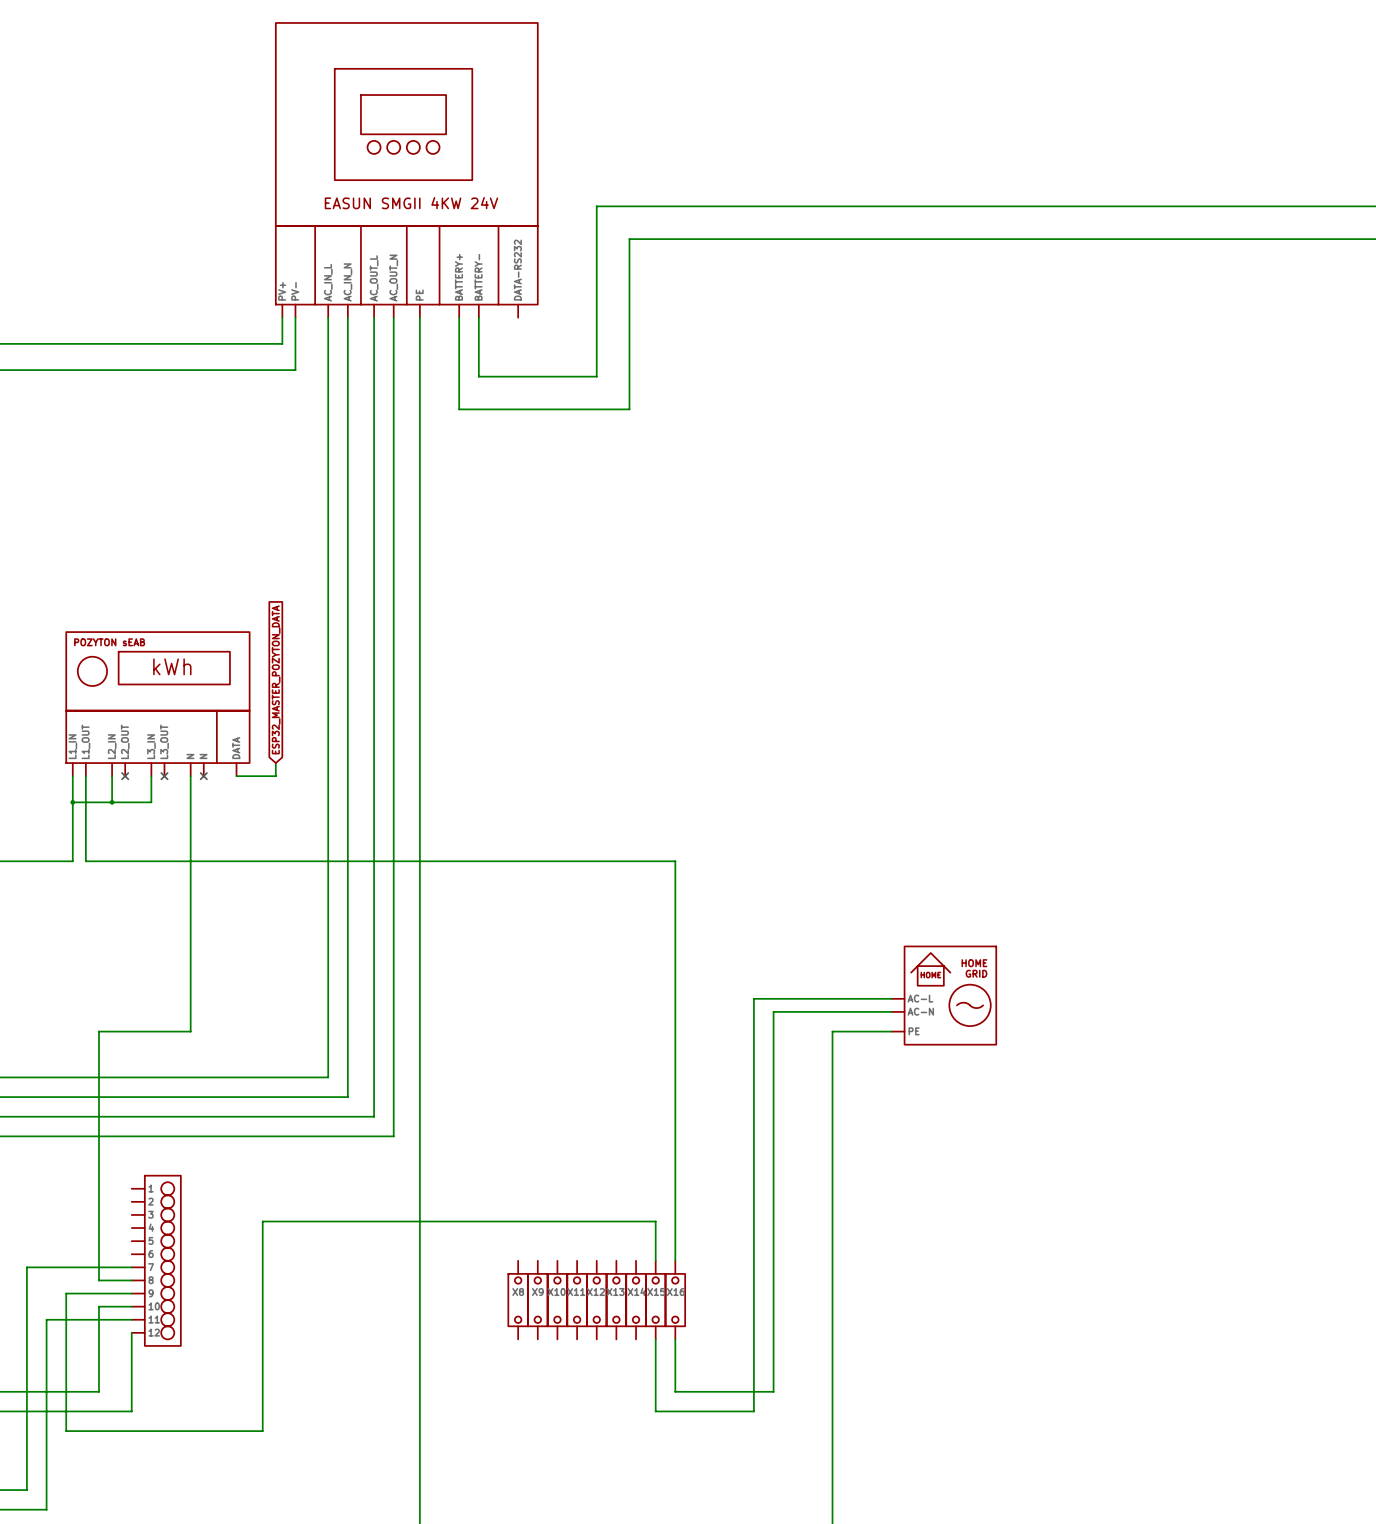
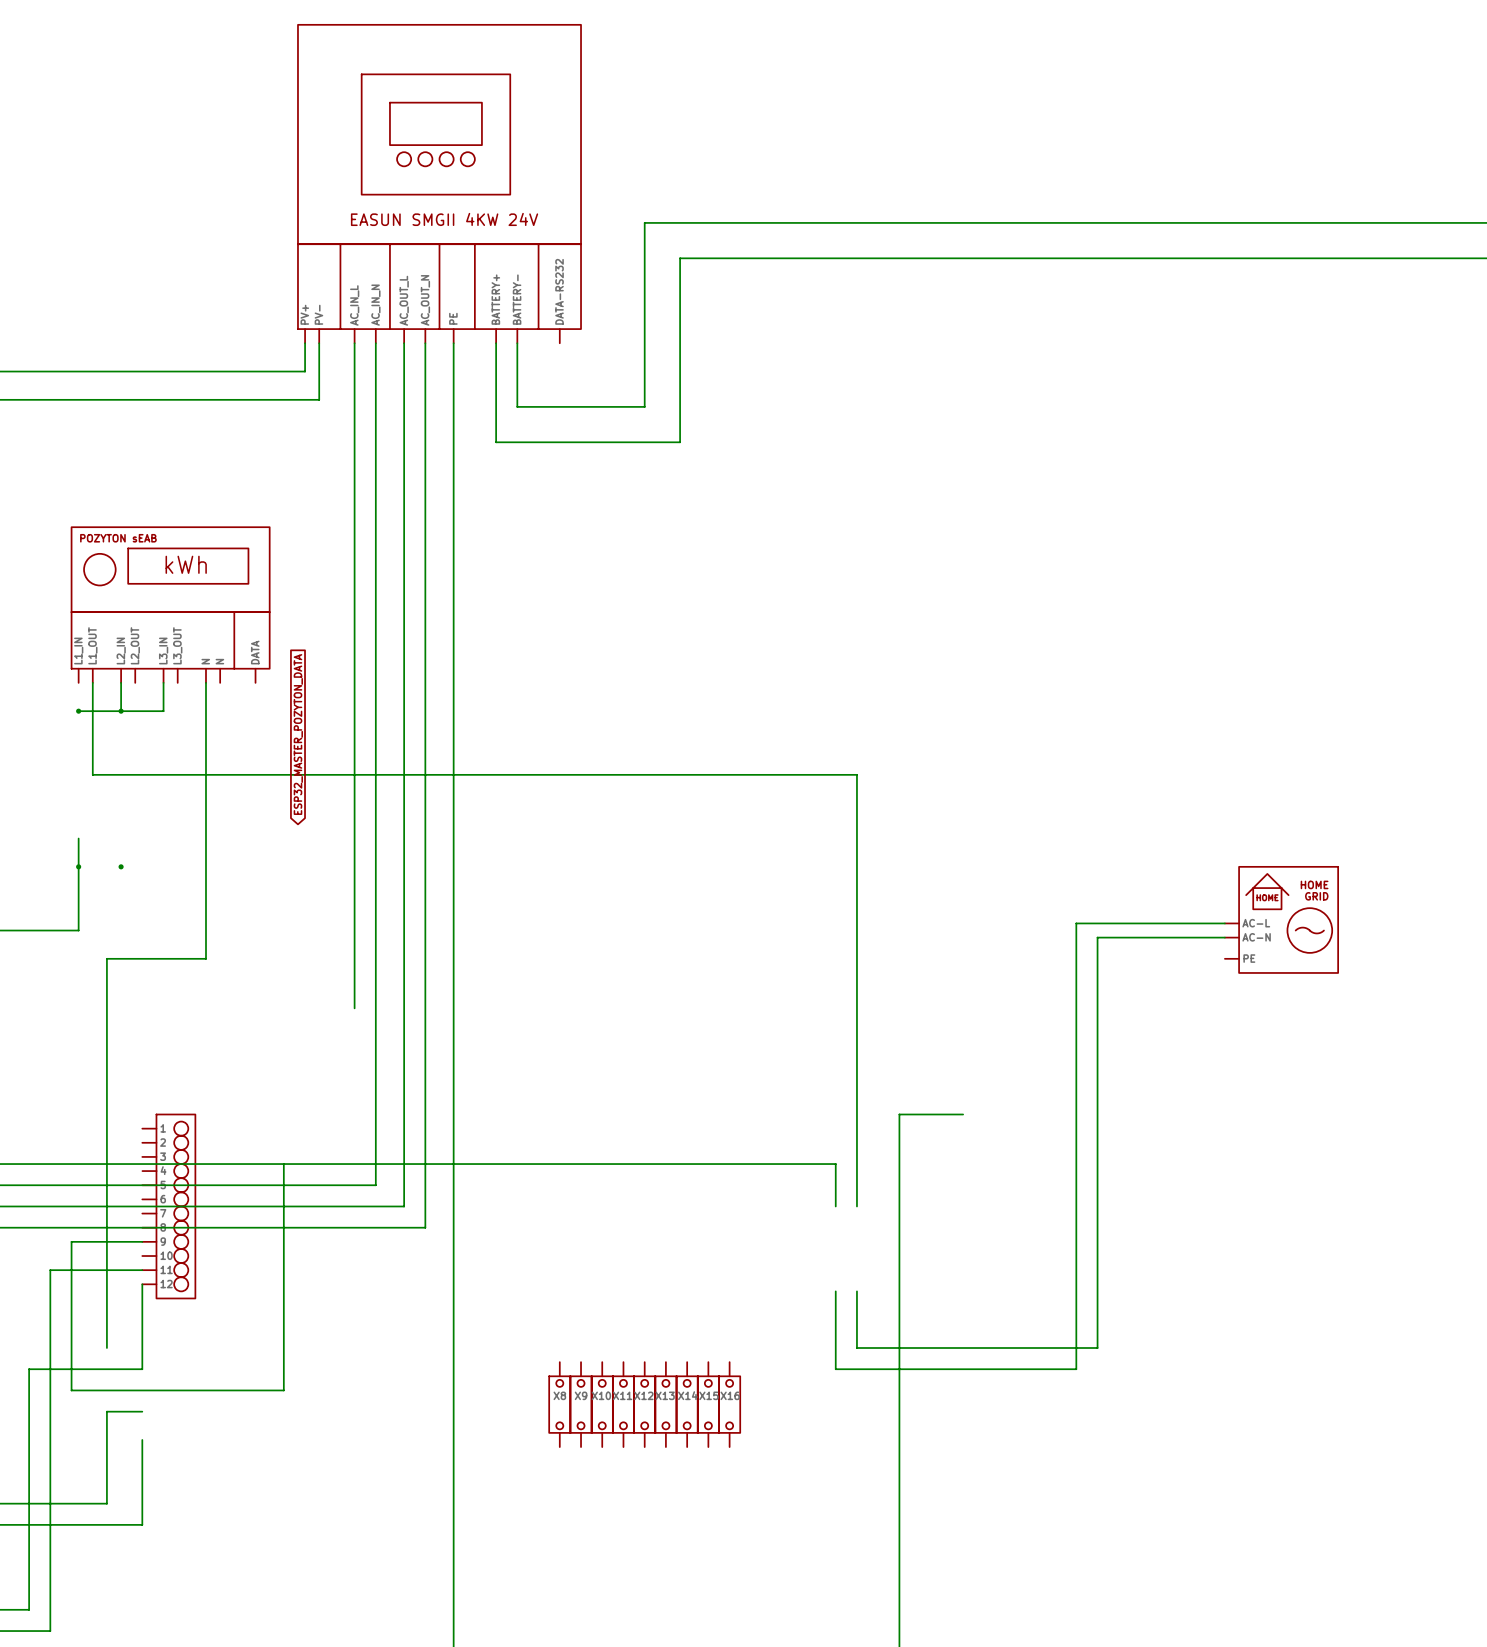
part: none -> (170, 605)
wire: none -> (92, 682) (92, 774) (856, 774) (856, 1206)
wire: none -> (121, 682) (121, 711)
wire: none -> (163, 682) (163, 711) (78, 711)
wire: none -> (206, 682) (206, 838)
junction: none -> (78, 711)
junction: none -> (121, 711)
part: (157, 704) -> none
wire: (275, 763) (275, 776) (236, 776) -> none
wire: (85, 776) (85, 861) (675, 861) (675, 1260) -> none
wire: (112, 776) (112, 802) -> none
no-connect mark: (125, 776) -> none
wire: (151, 776) (151, 802) (72, 802) -> none
no-connect mark: (164, 776) -> none
no-connect mark: (203, 776) -> none
part: none -> (1281, 919)
wire: none -> (1224, 937) (1097, 937) (1097, 1347) (856, 1347) (856, 1291)
wire: (190, 887) (190, 1031) (98, 1031) -> (206, 958) (106, 958) (106, 1114)
wire: (328, 933) (328, 1077) -> (835, 1164) (354, 1164)
part: (943, 995) -> none
wire: (891, 998) (753, 998) (753, 1411) (655, 1411) (655, 1339) -> none
wire: (891, 1011) (773, 1011) (773, 1077) -> none
part: none -> (168, 1206)
wire: (773, 1116) (773, 1195) -> none
wire: none -> (142, 1284) (142, 1369)
wire: (262, 1221) (655, 1221) (655, 1260) -> (283, 1319) (283, 1164)
wire: (98, 1247) (98, 1280) (131, 1280) -> none
part: (156, 1260) -> none
wire: (773, 1267) (773, 1391) (675, 1391) (675, 1339) -> (835, 1369) (1076, 1369) (1076, 923) (1224, 923)
wire: (262, 1287) (262, 1431) (66, 1431) (66, 1293) (131, 1293) -> (283, 1390) (71, 1390) (71, 1241) (142, 1241)
wire: (46, 1319) (131, 1319) -> (50, 1425) (50, 1270) (142, 1270)

